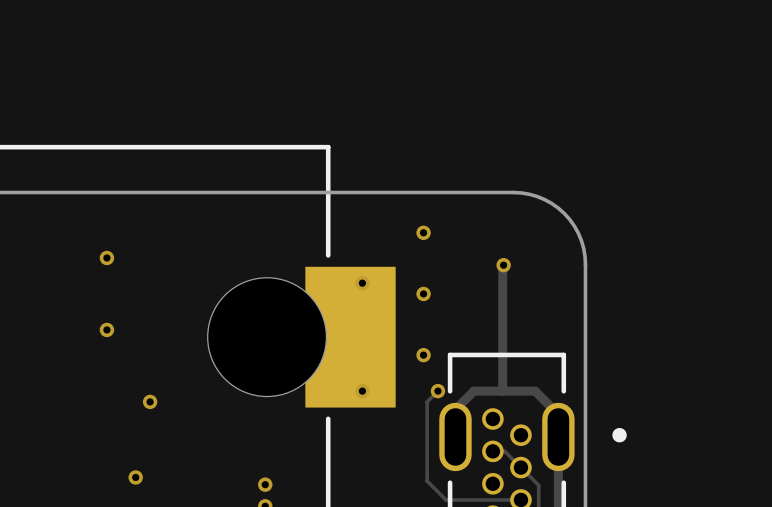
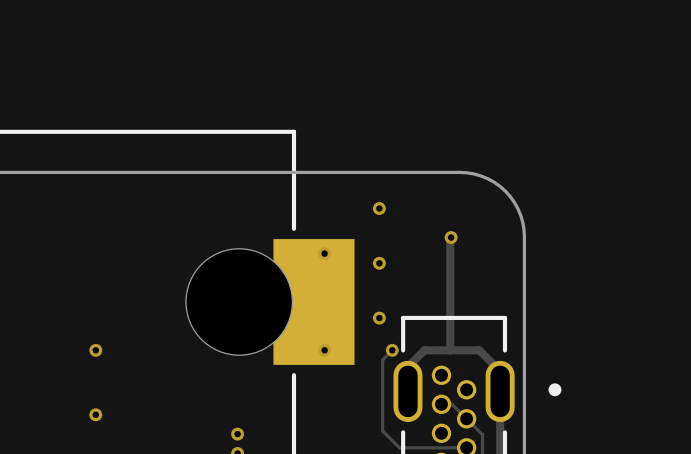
via: (106, 257) -> none
via: (106, 329) -> none
via: none -> (95, 350)
via: (150, 401) -> none
via: none -> (95, 414)
via: (135, 477) -> none

